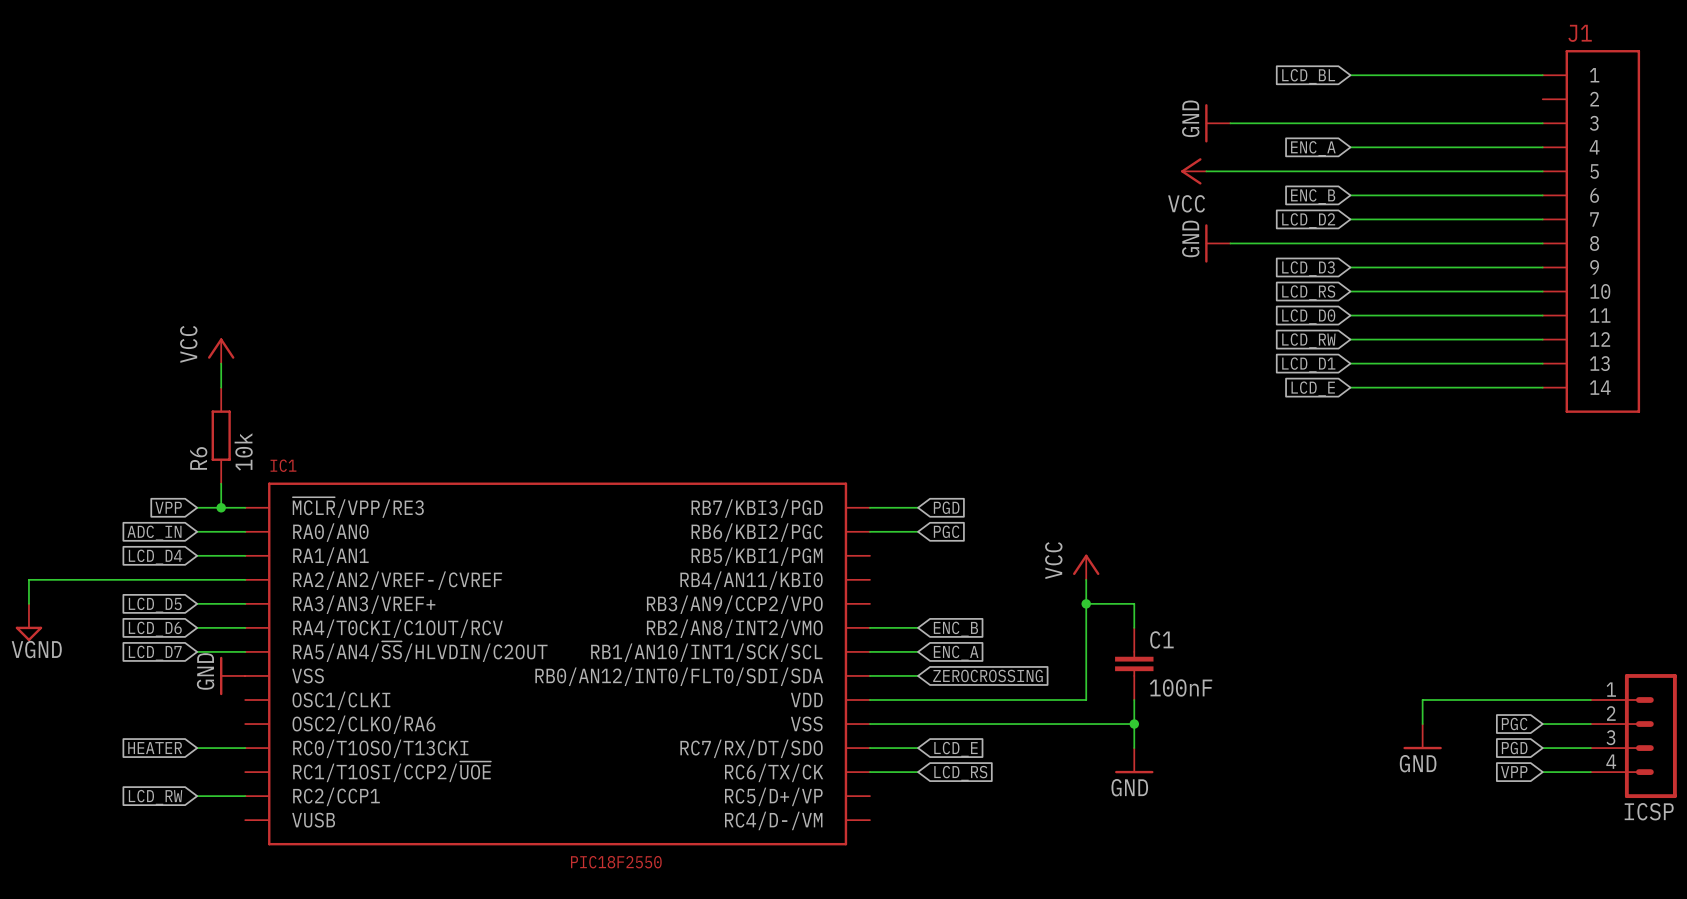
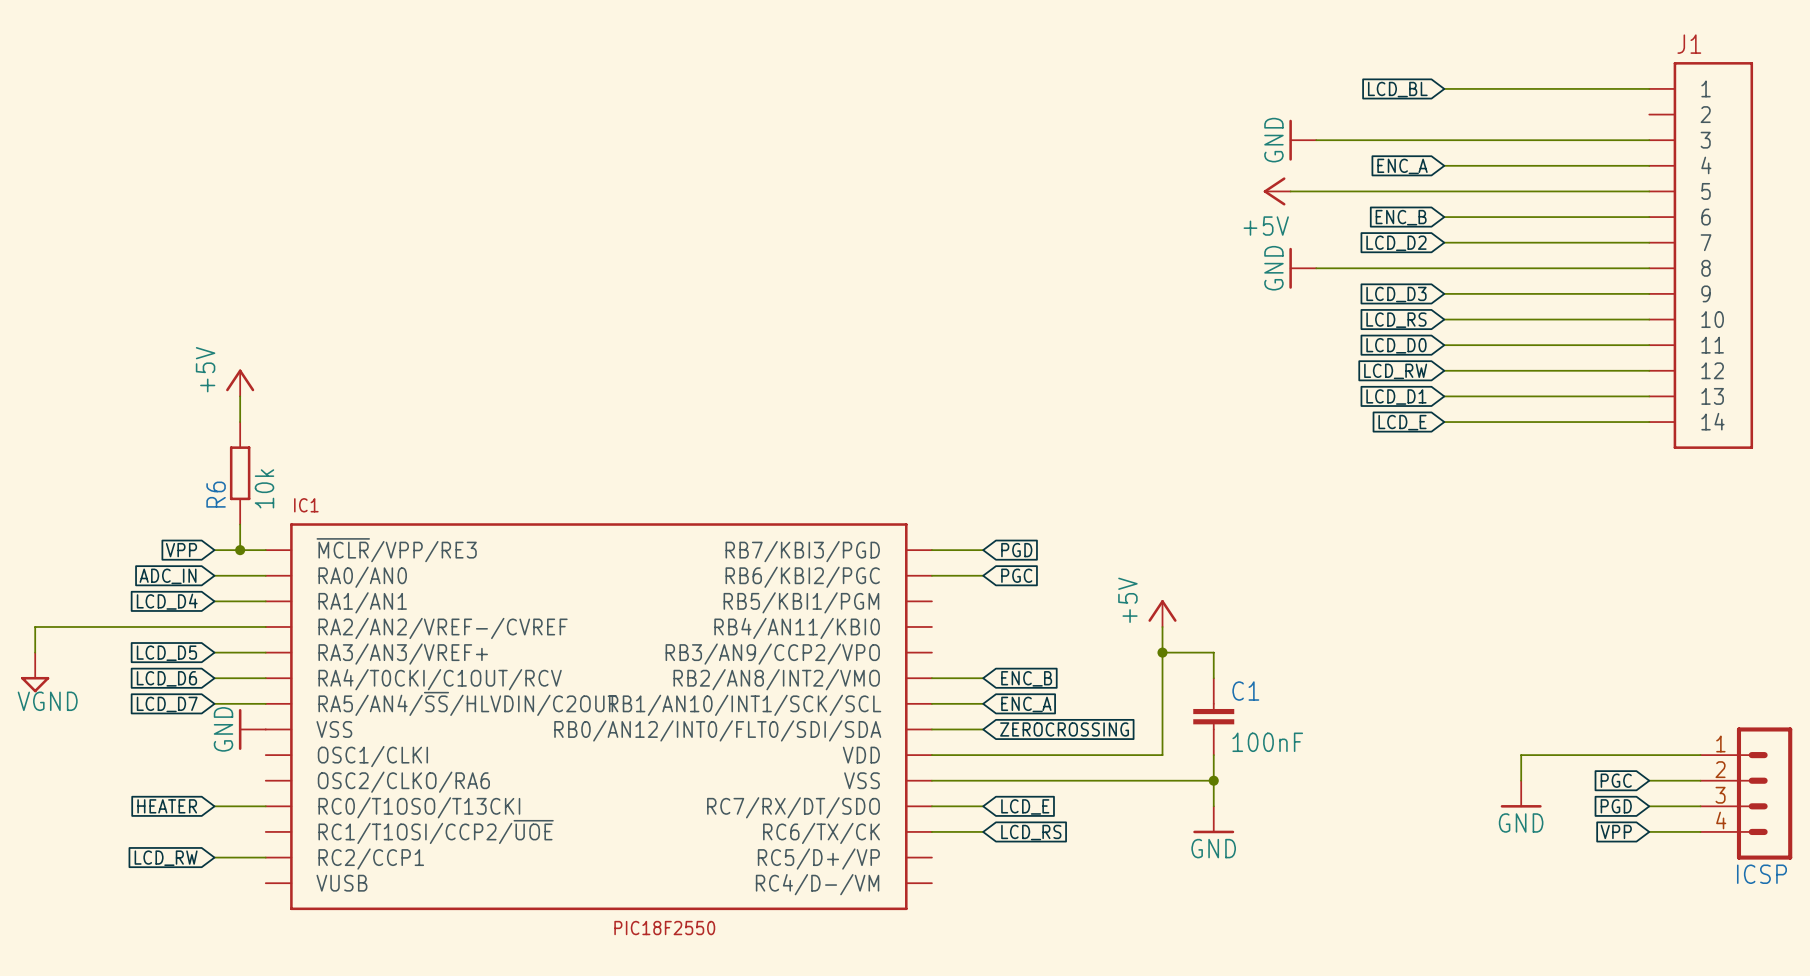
power symbol: VCC (1193, 171) -> +5V (1277, 191)
power symbol: VCC (221, 350) -> +5V (240, 382)
power symbol: VCC (1086, 567) -> +5V (1162, 613)

